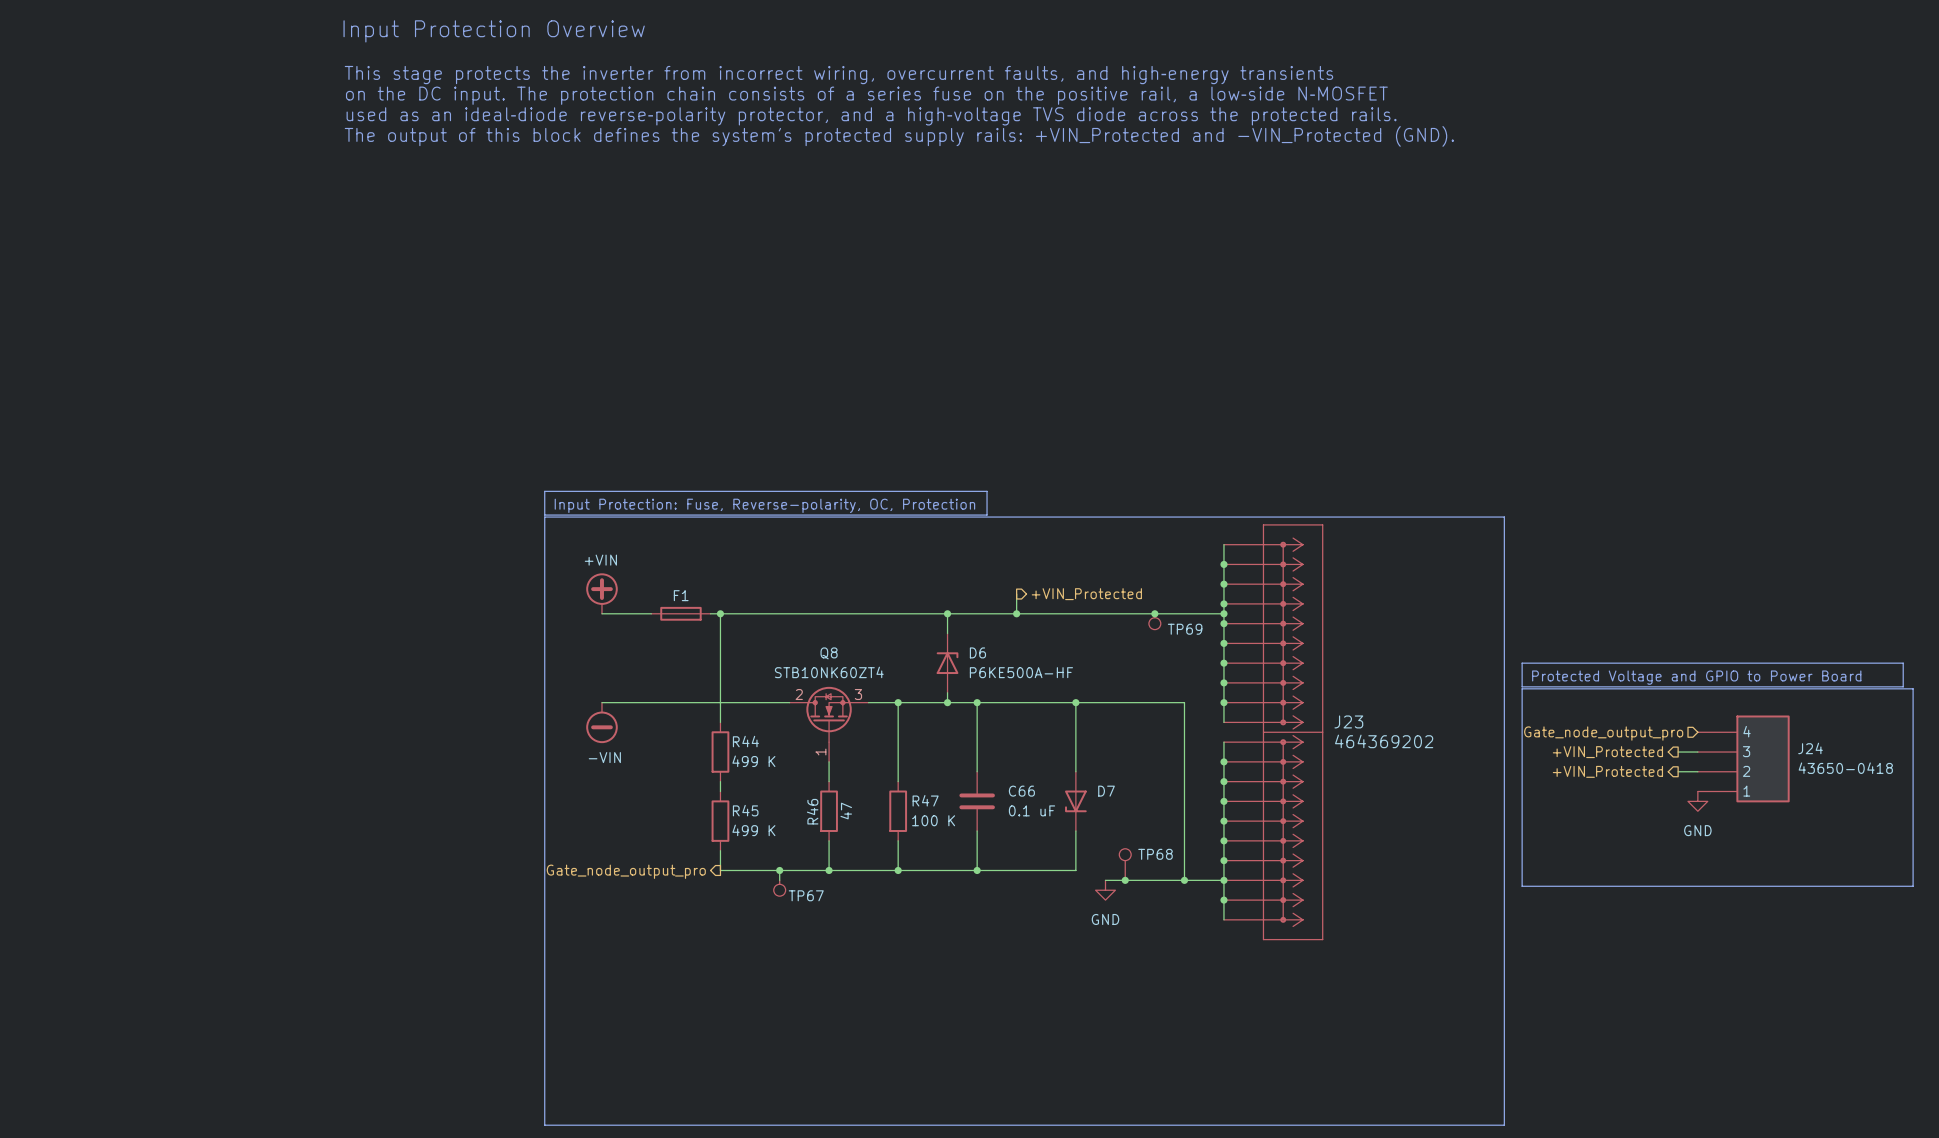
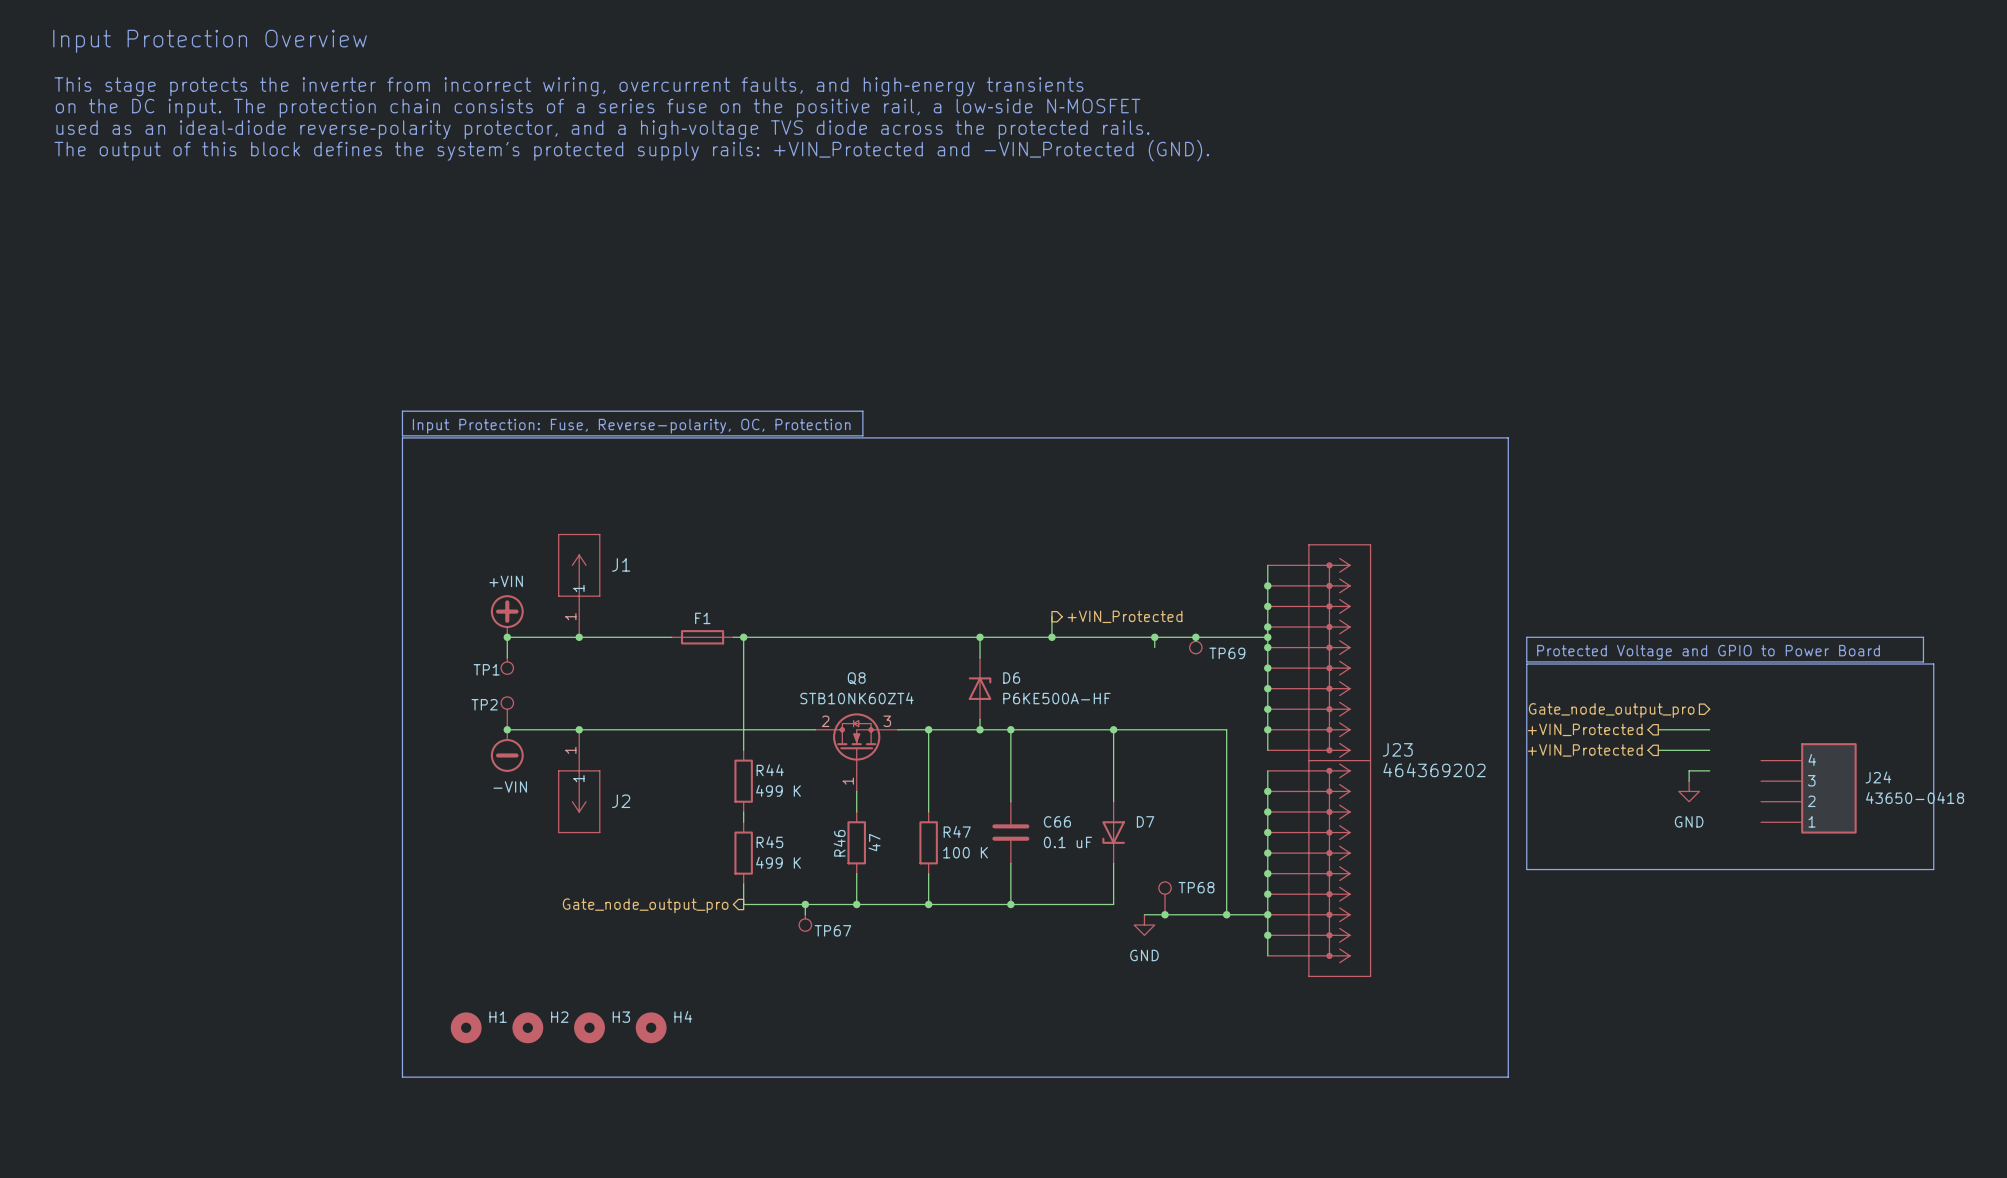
text: Input Protection Overview (494, 31) -> none
text: none -> Input Protection Overview (210, 41)
text: This stage protects the inverter from incorrect wiring, overcurrent faults, and high‑energy transients (838, 75) -> none
text: none -> This stage protects the inverter from incorrect wiring, overcurrent faults, and high‑energy transients (568, 86)
text: on the DC input. The protection chain consists of a series fuse on the positive rail, a low‑side N‑MOSFET (866, 95) -> none
text: none -> on the DC input. The protection chain consists of a series fuse on the positive rail, a low‑side N‑MOSFET (598, 108)
text: used as an ideal‑diode reverse‑polarity protector, and a high‑voltage TVS diode across the protected rails. (871, 116) -> none
text: none -> used as an ideal‑diode reverse‑polarity protector, and a high‑voltage TVS diode across the protected rails. (602, 129)
text: The output of this block defines the system's protected supply rails: +VIN_Protected and −VIN_Protected (GND). (899, 136) -> none
text: none -> The output of this block defines the system's protected supply rails: +VIN_Protected and −VIN_Protected (GND). (631, 150)
line: (544, 491) (544, 515) (987, 515) (987, 491) (544, 491) -> (402, 411) (402, 435) (862, 435) (862, 411) (402, 411)
text position: Input Protection: Fuse, Reverse-polarity, OC, Protection (764, 505) -> Input Protection: Fuse, Reverse-polarity, OC, Protection (631, 426)
line: (544, 517) (1504, 517) (1504, 1125) (544, 1125) (544, 517) -> (402, 437) (402, 1077) (1508, 1077) (1508, 437) (402, 437)
J1: none -> (579, 585)
power symbol position: +VIN (601, 593) -> +VIN (507, 616)
junction: none -> (507, 637)
junction: none -> (579, 637)
wire: none -> (620, 637) (507, 637) (507, 657)
wire: none -> (1154, 637) (1154, 647)
junction: none -> (1154, 637)
TP1: none -> (507, 666)
line: (1522, 663) (1522, 686) (1903, 686) (1903, 663) (1522, 663) -> (1526, 637) (1526, 661) (1923, 661) (1923, 637) (1526, 637)
text position: Protected Voltage and GPIO to Power Board (1696, 677) -> Protected Voltage and GPIO to Power Board (1708, 652)
TP2: none -> (507, 713)
line: (1522, 688) (1913, 688) (1913, 886) (1522, 886) (1522, 688) -> (1526, 664) (1933, 664) (1933, 869) (1526, 869) (1526, 664)
wire: none -> (507, 729) (620, 729)
junction: none -> (507, 729)
junction: none -> (579, 729)
hierarchical label: none -> +VIN_Protected (1585, 729)
wire: none -> (1658, 729) (1709, 729)
power symbol position: -VIN (601, 722) -> -VIN (507, 750)
hierarchical label: none -> +VIN_Protected (1585, 750)
wire: none -> (1658, 750) (1709, 750)
hierarchical label position: Gate_node_output_pro (1603, 733) -> Gate_node_output_pro (1611, 710)
wire: none -> (1709, 770) (1689, 770) (1689, 781)
J2: none -> (579, 781)
hierarchical label: +VIN_Protected (1607, 752) -> none
wire: (1678, 752) (1697, 752) -> none
hierarchical label: +VIN_Protected (1607, 771) -> none
wire: (1678, 771) (1697, 771) -> none
power symbol position: GND (1697, 801) -> GND (1689, 791)
H1: none -> (466, 1027)
H2: none -> (527, 1027)
H3: none -> (589, 1027)
H4: none -> (651, 1027)

